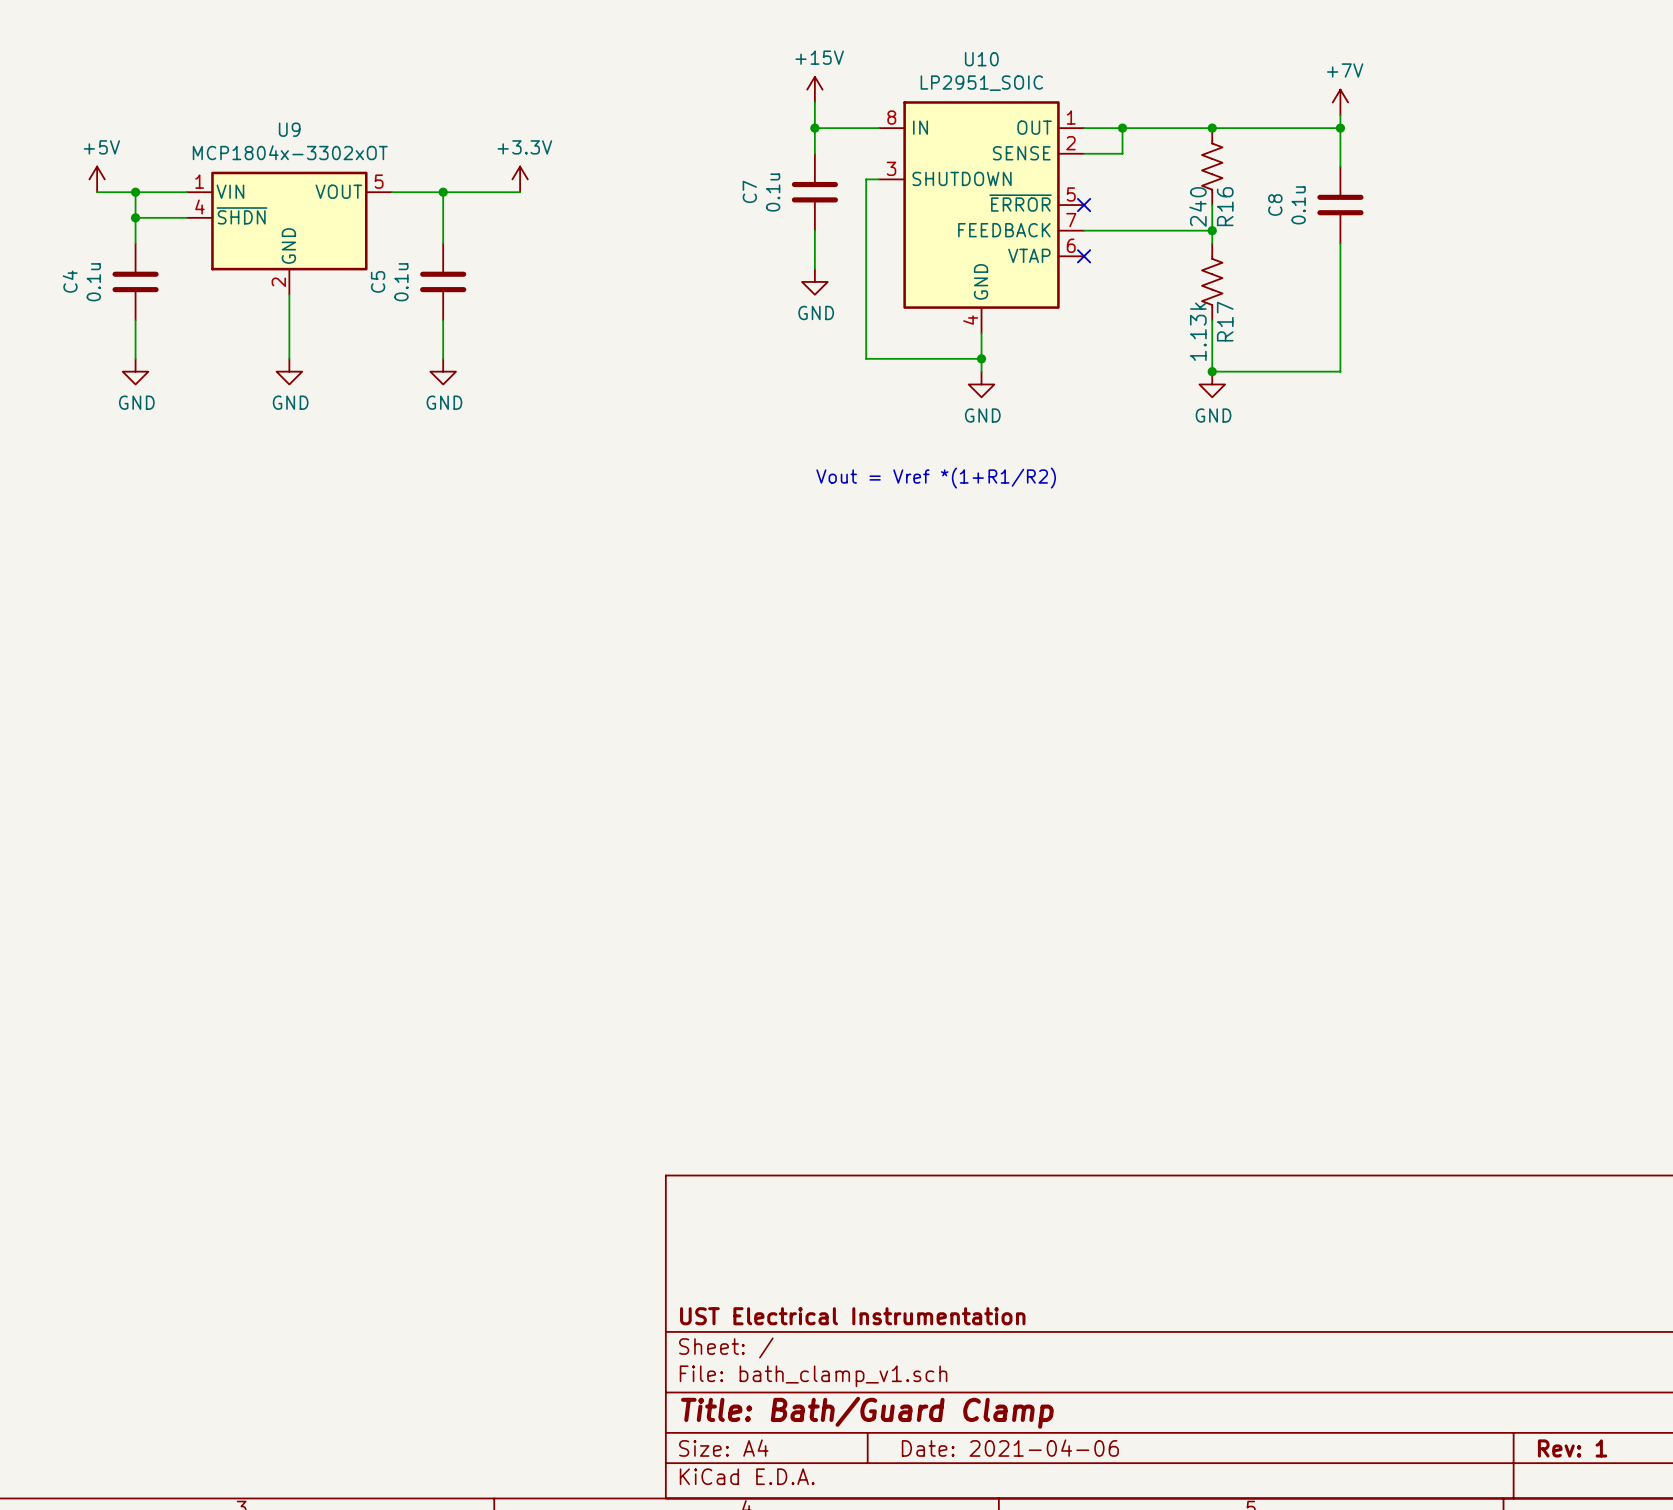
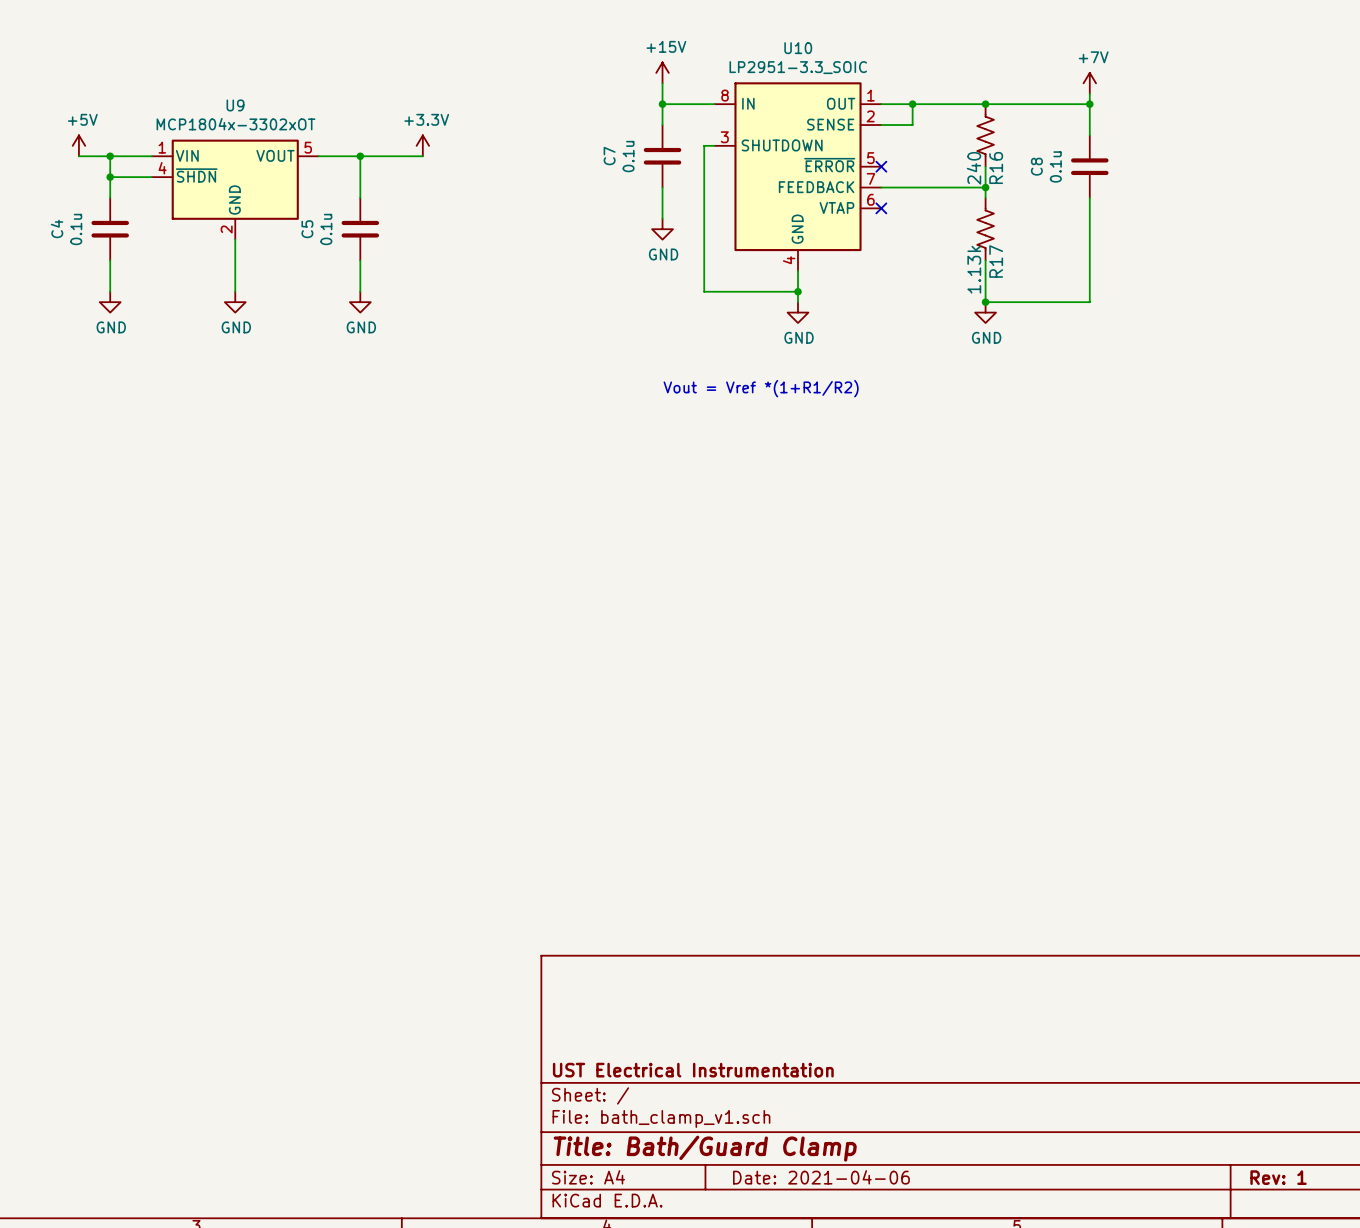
U10 value: LP2951_SOIC (981, 83) -> LP2951-3.3_SOIC (798, 67)

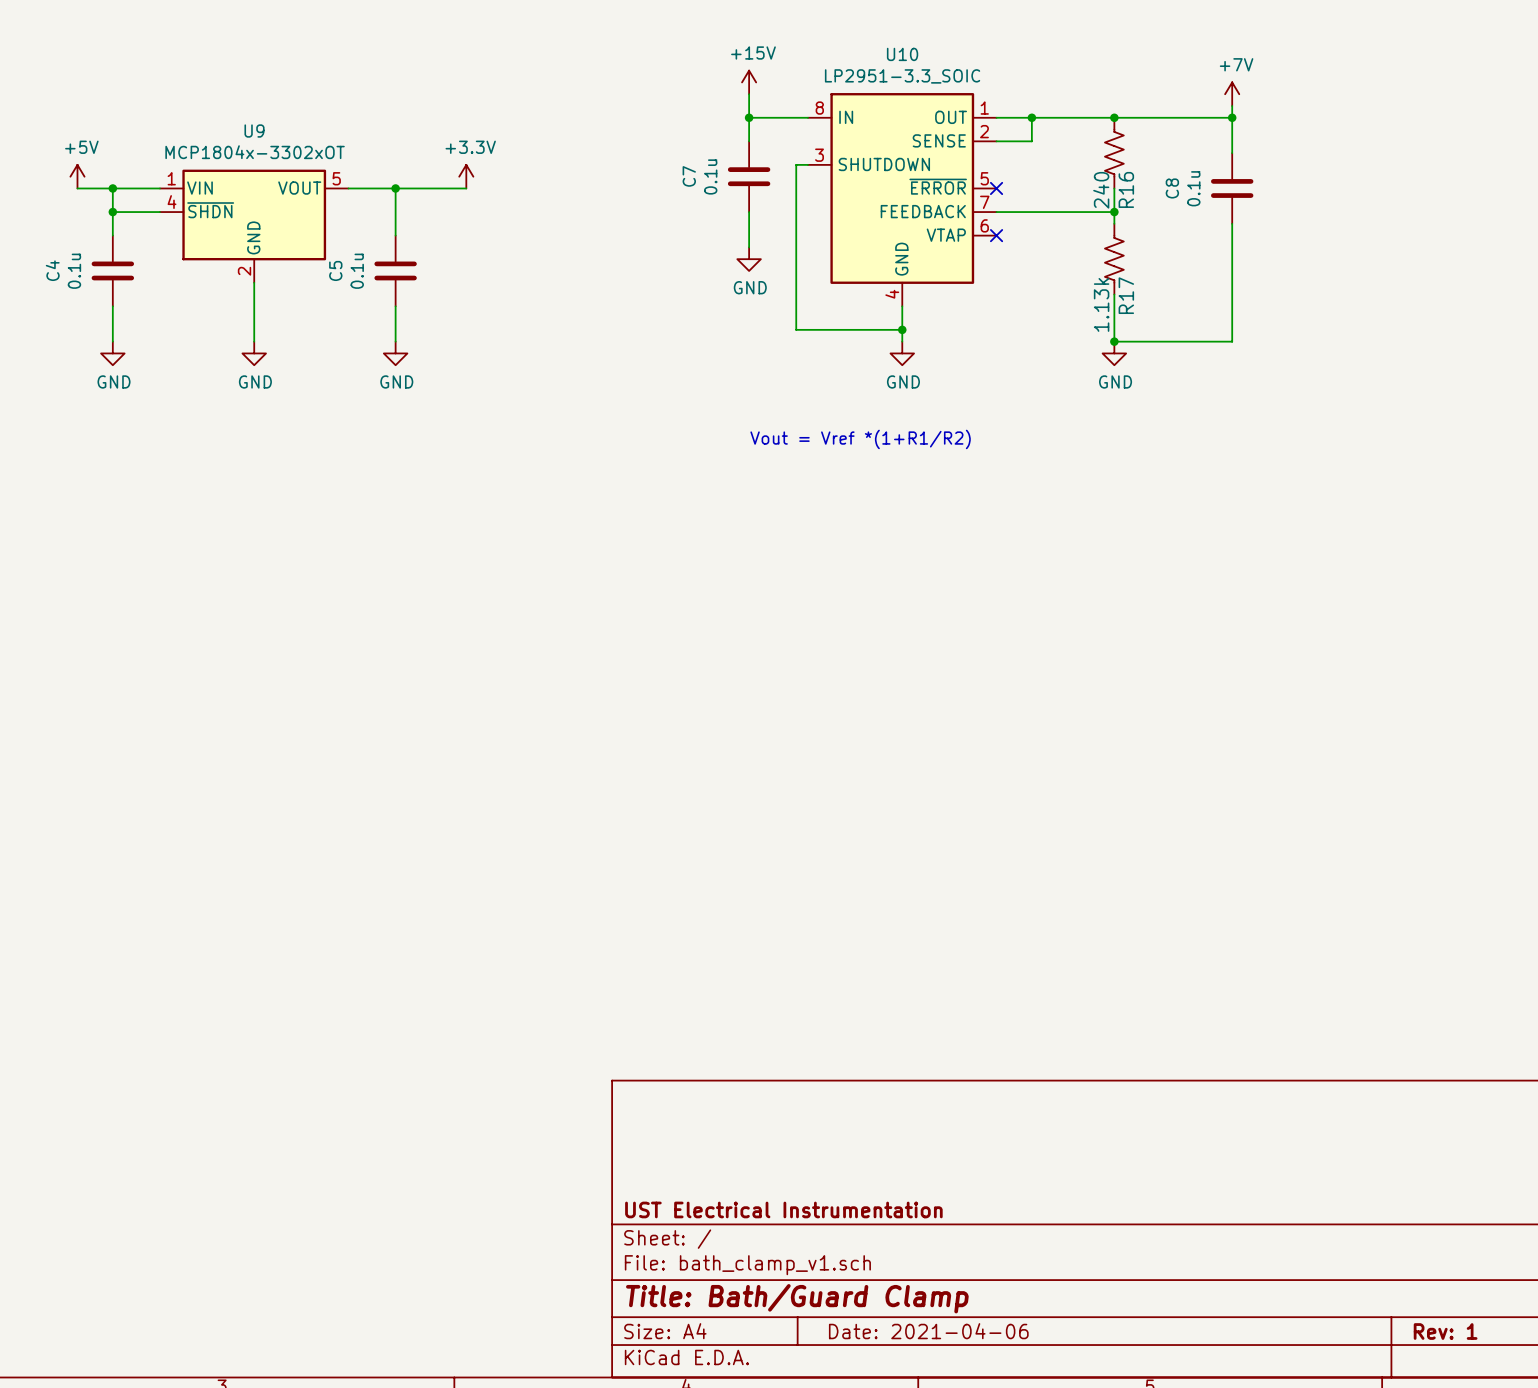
power symbol position: +5V (78, 145) -> +5V (77, 176)
power symbol position: +3.3V (422, 145) -> +3.3V (466, 176)
wire: (78, 156) (151, 156) -> (77, 188) (159, 188)
wire: (110, 156) (110, 197) -> (112, 188) (112, 235)
junction: (110, 156) -> none
wire: (318, 156) (422, 156) -> (348, 188) (466, 188)
wire: (360, 156) (360, 197) -> (395, 188) (395, 235)
junction position: (360, 156) -> (395, 188)
junction: none -> (112, 188)
wire: (110, 177) (151, 177) -> (112, 212) (159, 212)
junction: (110, 177) -> none
junction: none -> (112, 212)
U9 position: (235, 189) -> (254, 226)
C4 position: (110, 229) -> (112, 270)
C5 position: (360, 229) -> (395, 270)
wire: (235, 239) (235, 291) -> (254, 282) (254, 341)
wire: (110, 260) (110, 291) -> (112, 306) (112, 341)
wire: (360, 260) (360, 291) -> (395, 306) (395, 341)
power symbol position: GND (110, 302) -> GND (112, 353)
power symbol position: GND (235, 302) -> GND (254, 353)
power symbol position: GND (360, 302) -> GND (395, 353)

